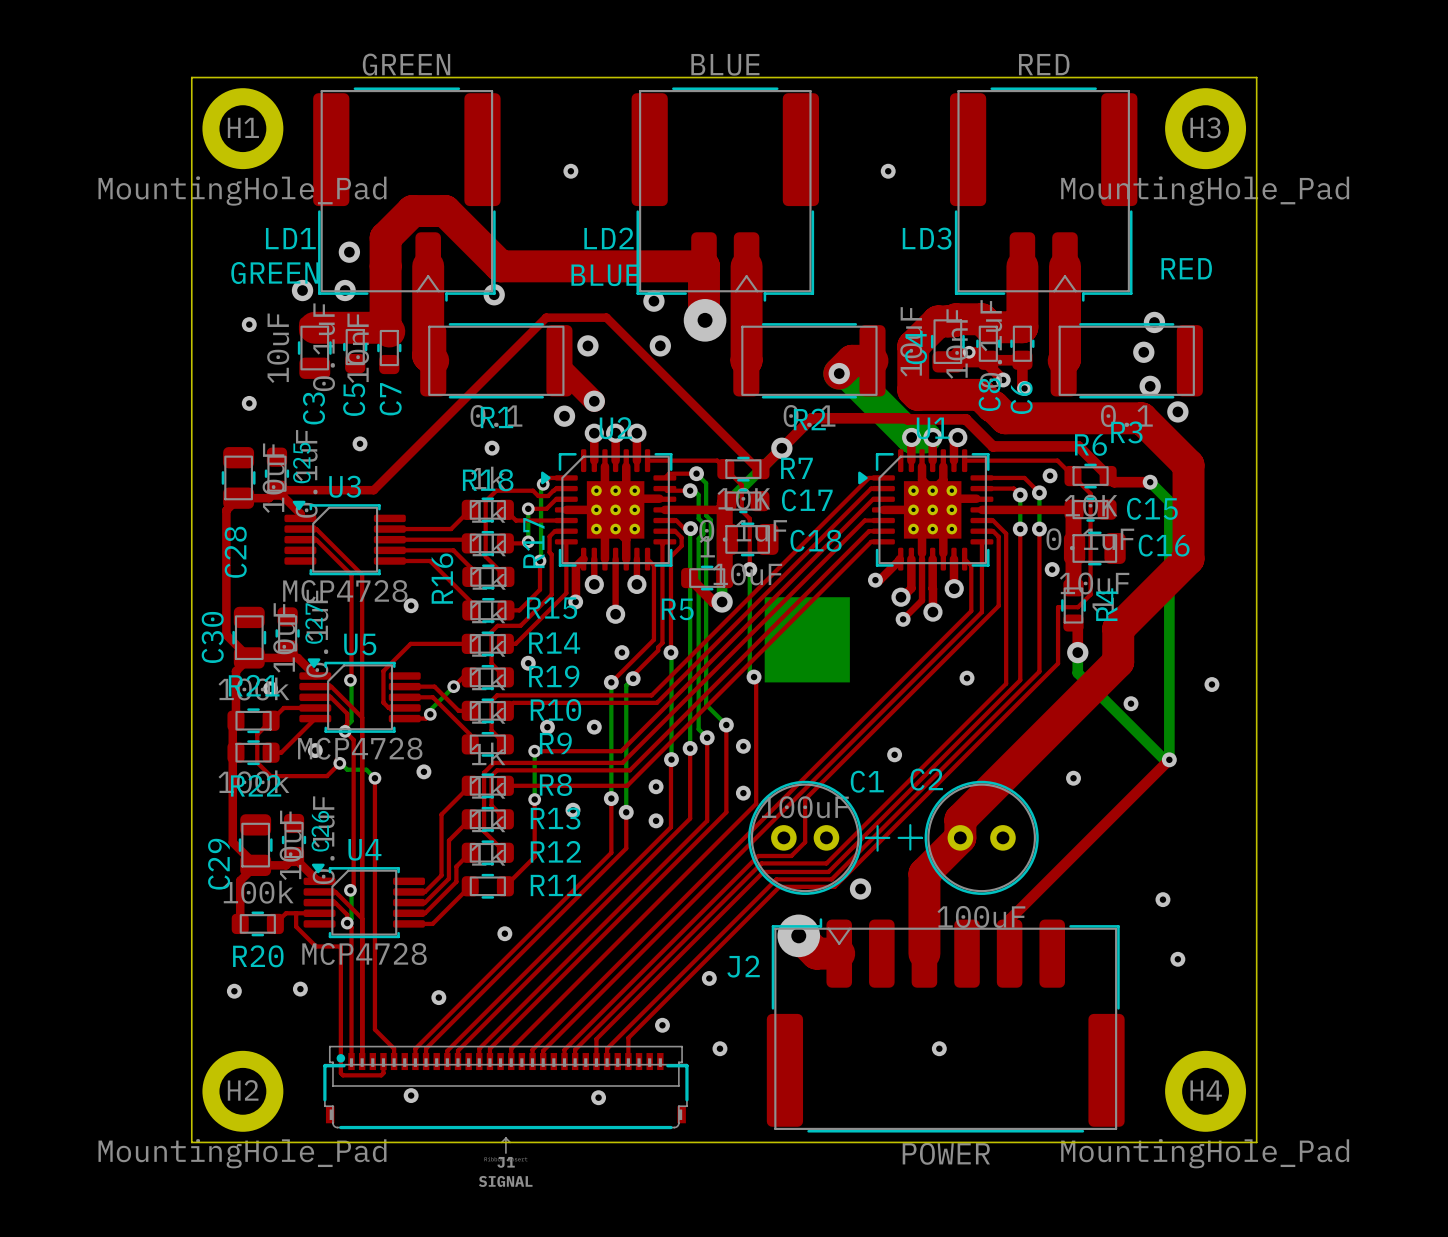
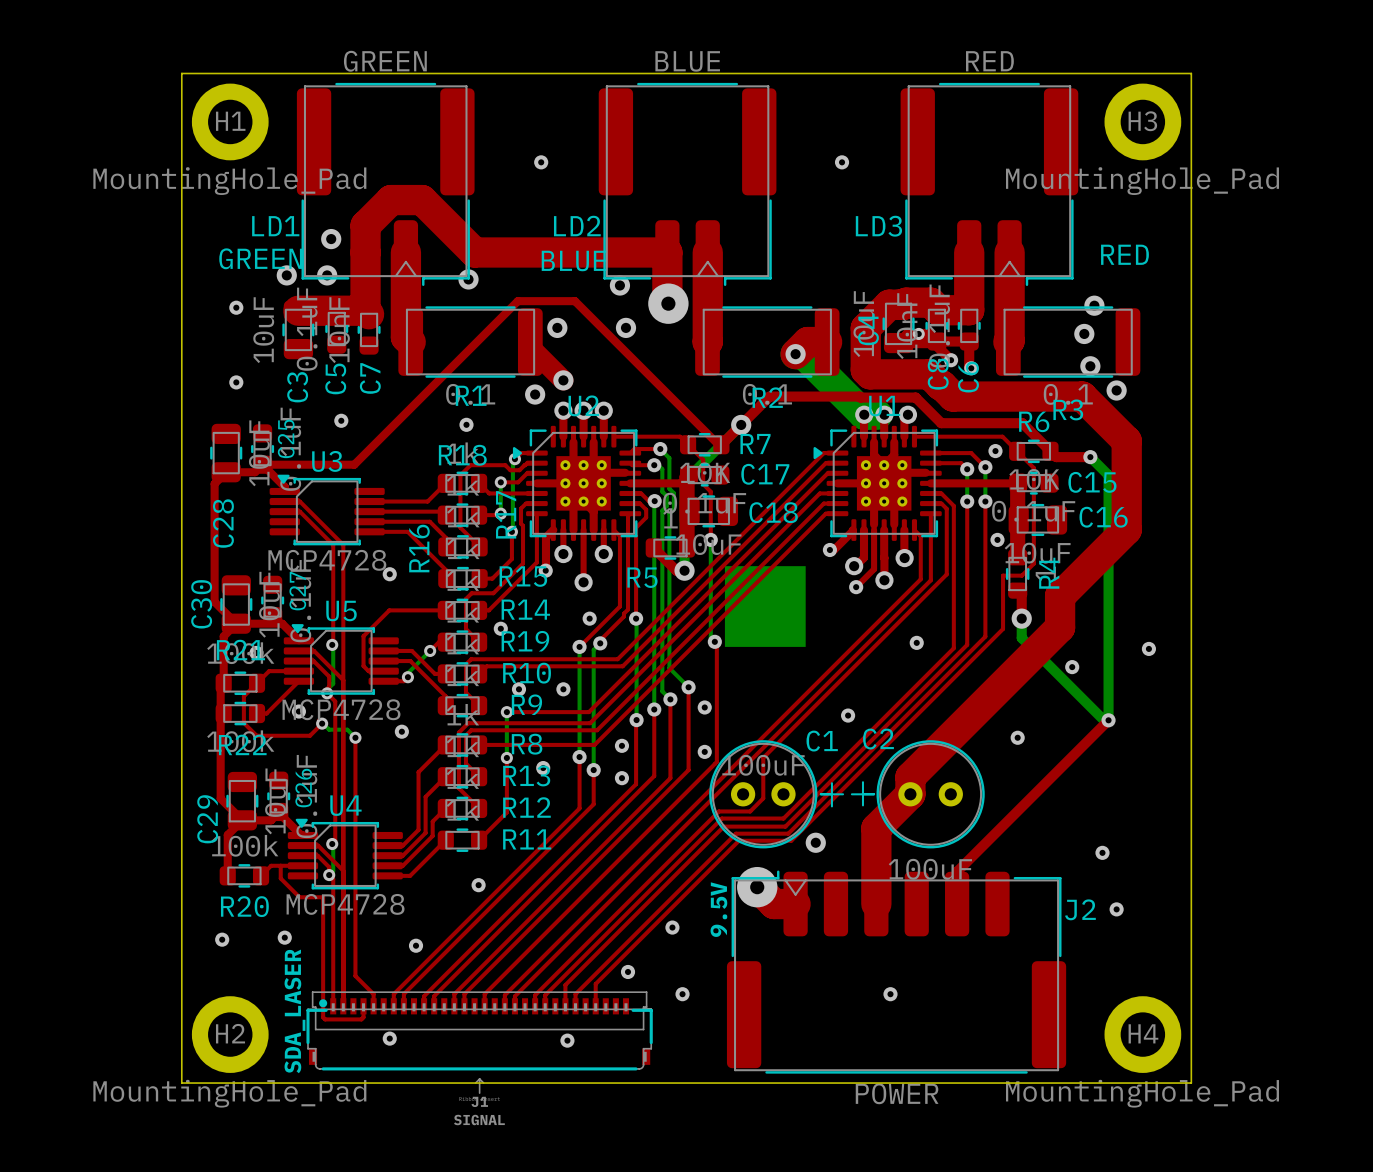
text: none -> 9.5V (718, 909)
J2 name position: J2 (743, 966) -> J2 (1080, 909)
text: none -> SDA_LASER (294, 1011)

